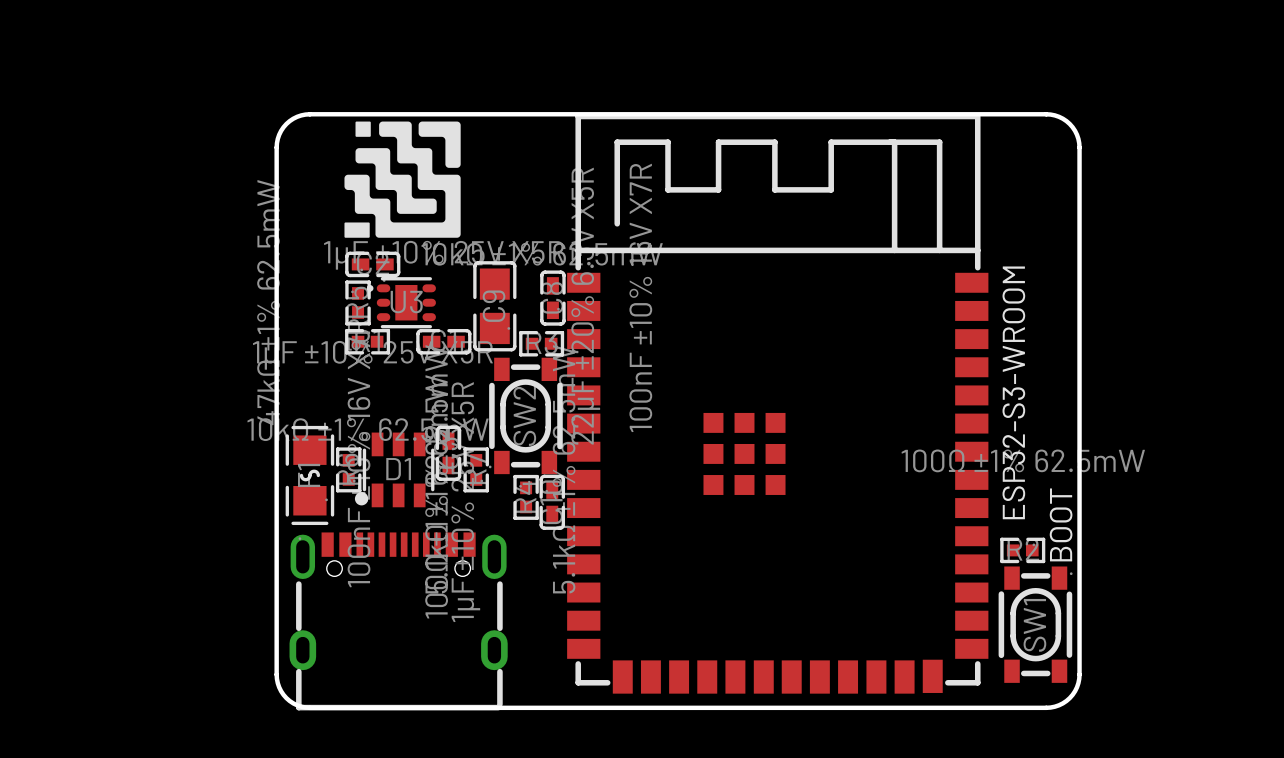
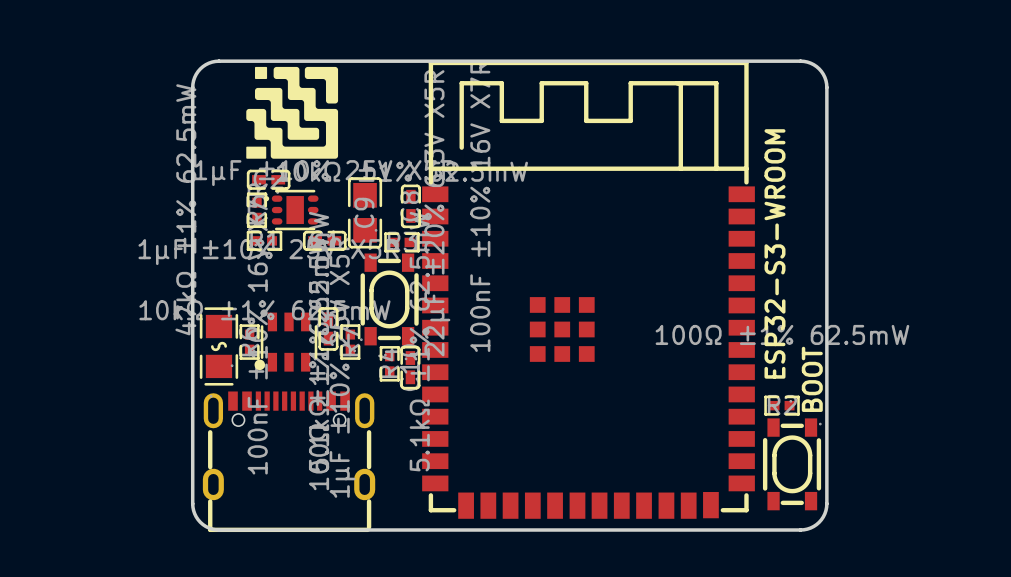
U3 name: U3 (406, 302) -> none
SW2 name: SW2 (524, 416) -> none
D1 name: D1 (398, 469) -> none
F1 name: F1 (309, 475) -> none
SW1 name: SW1 (1034, 625) -> none

